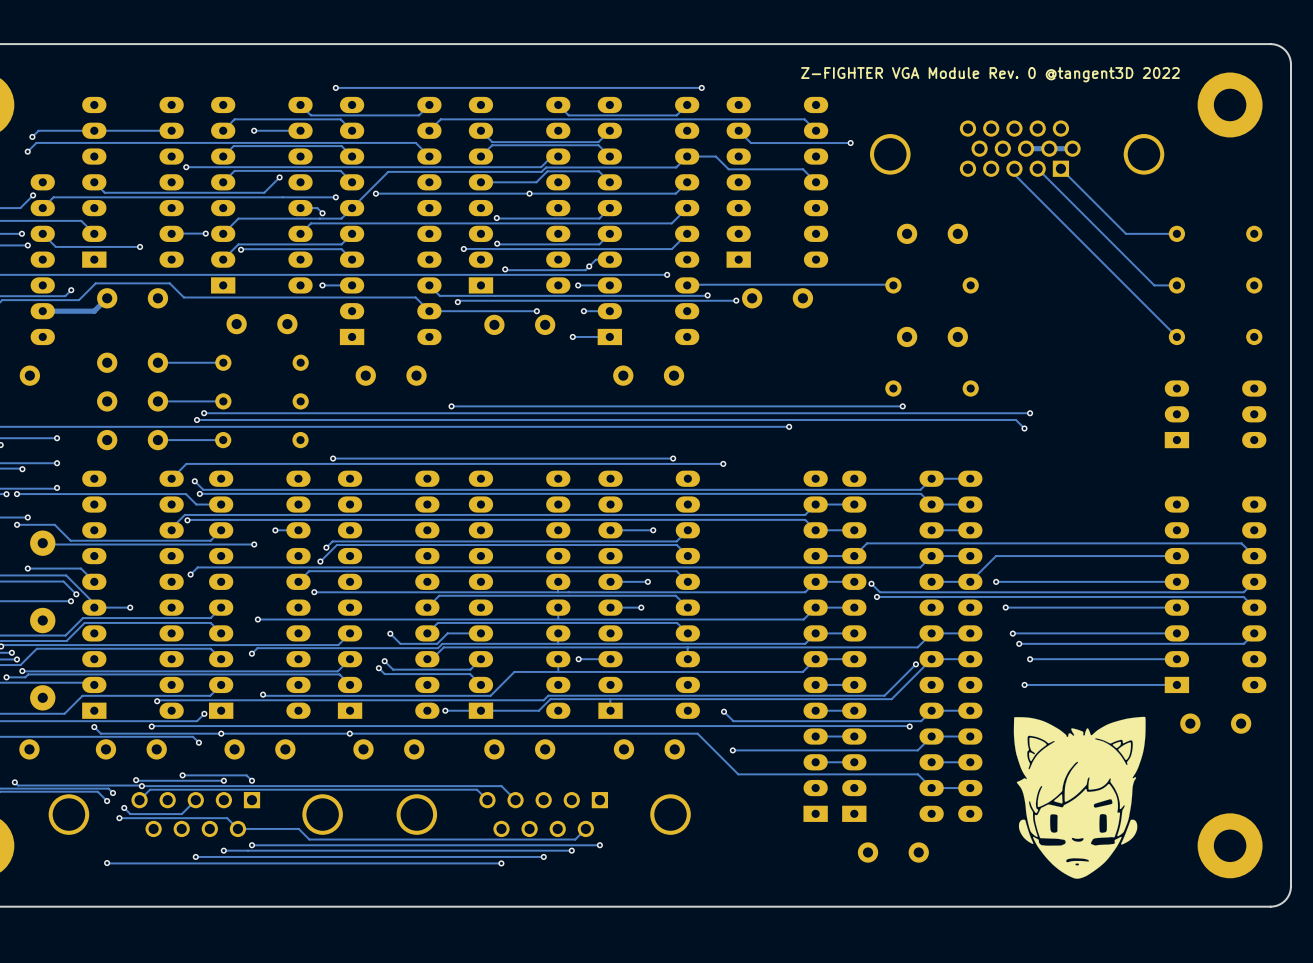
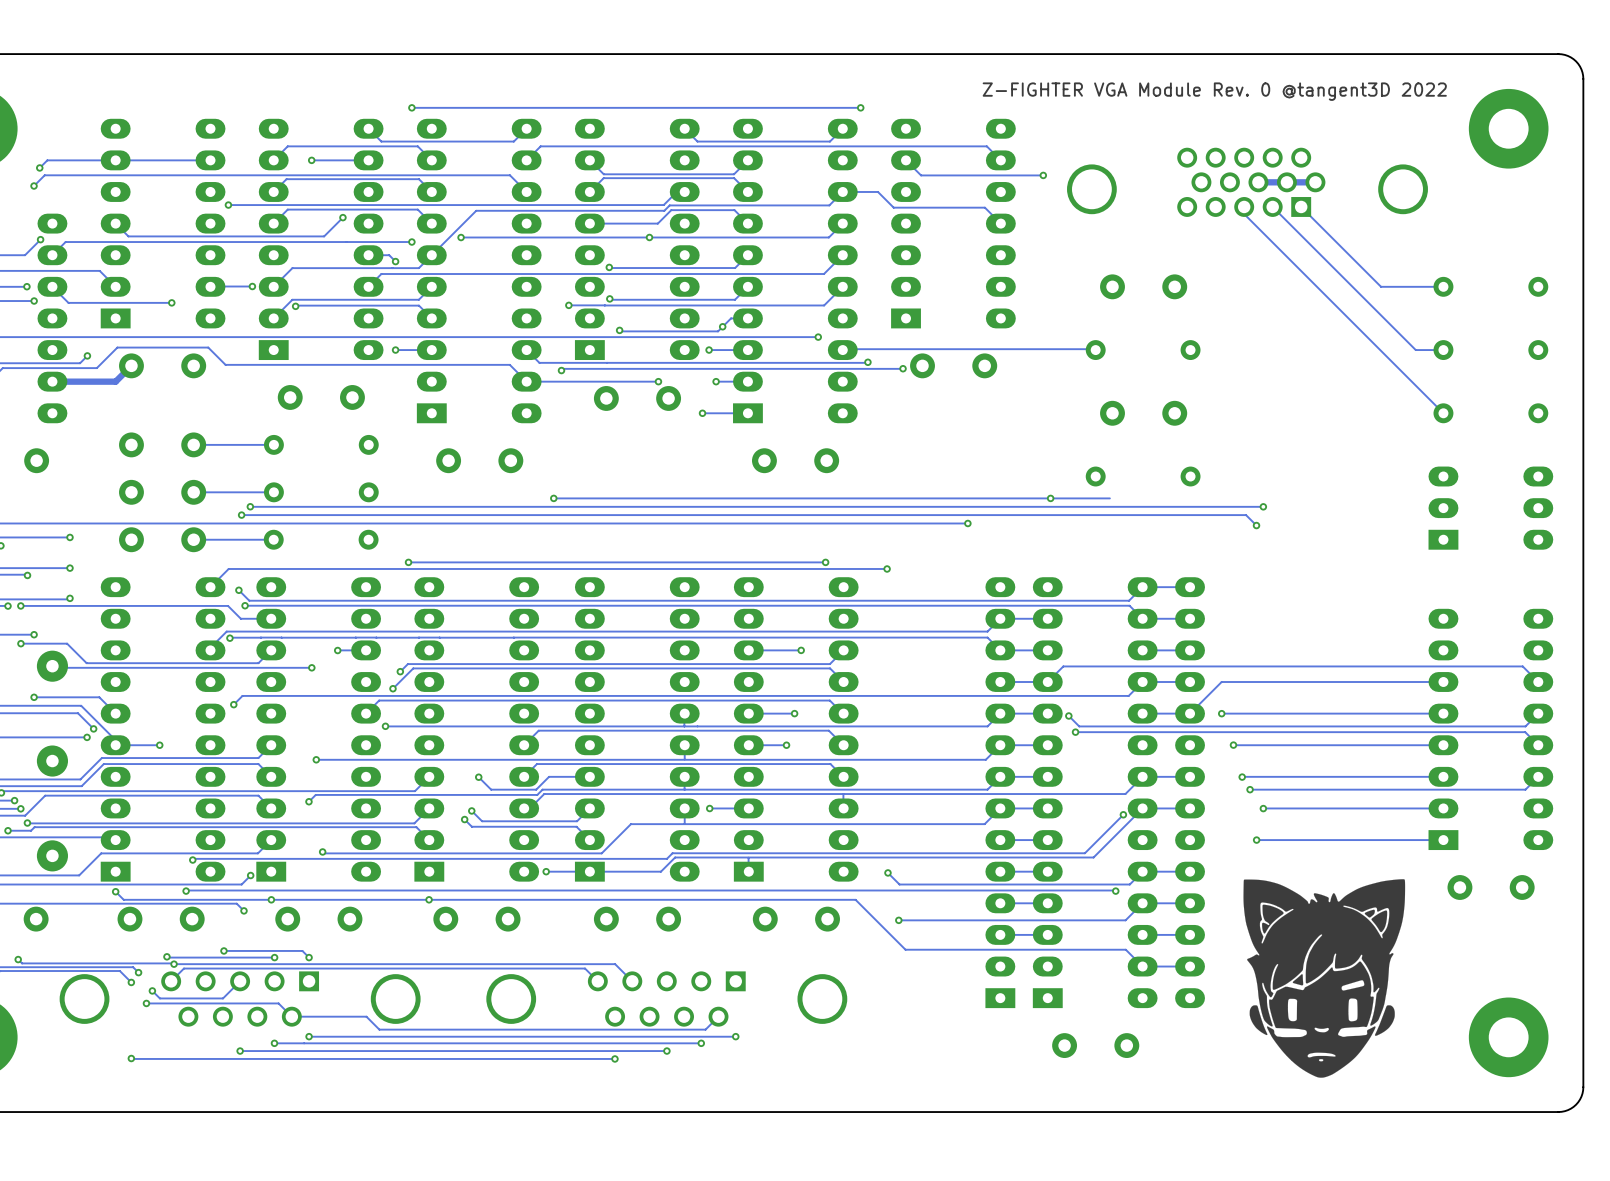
via position: (902, 406) -> (1050, 498)

